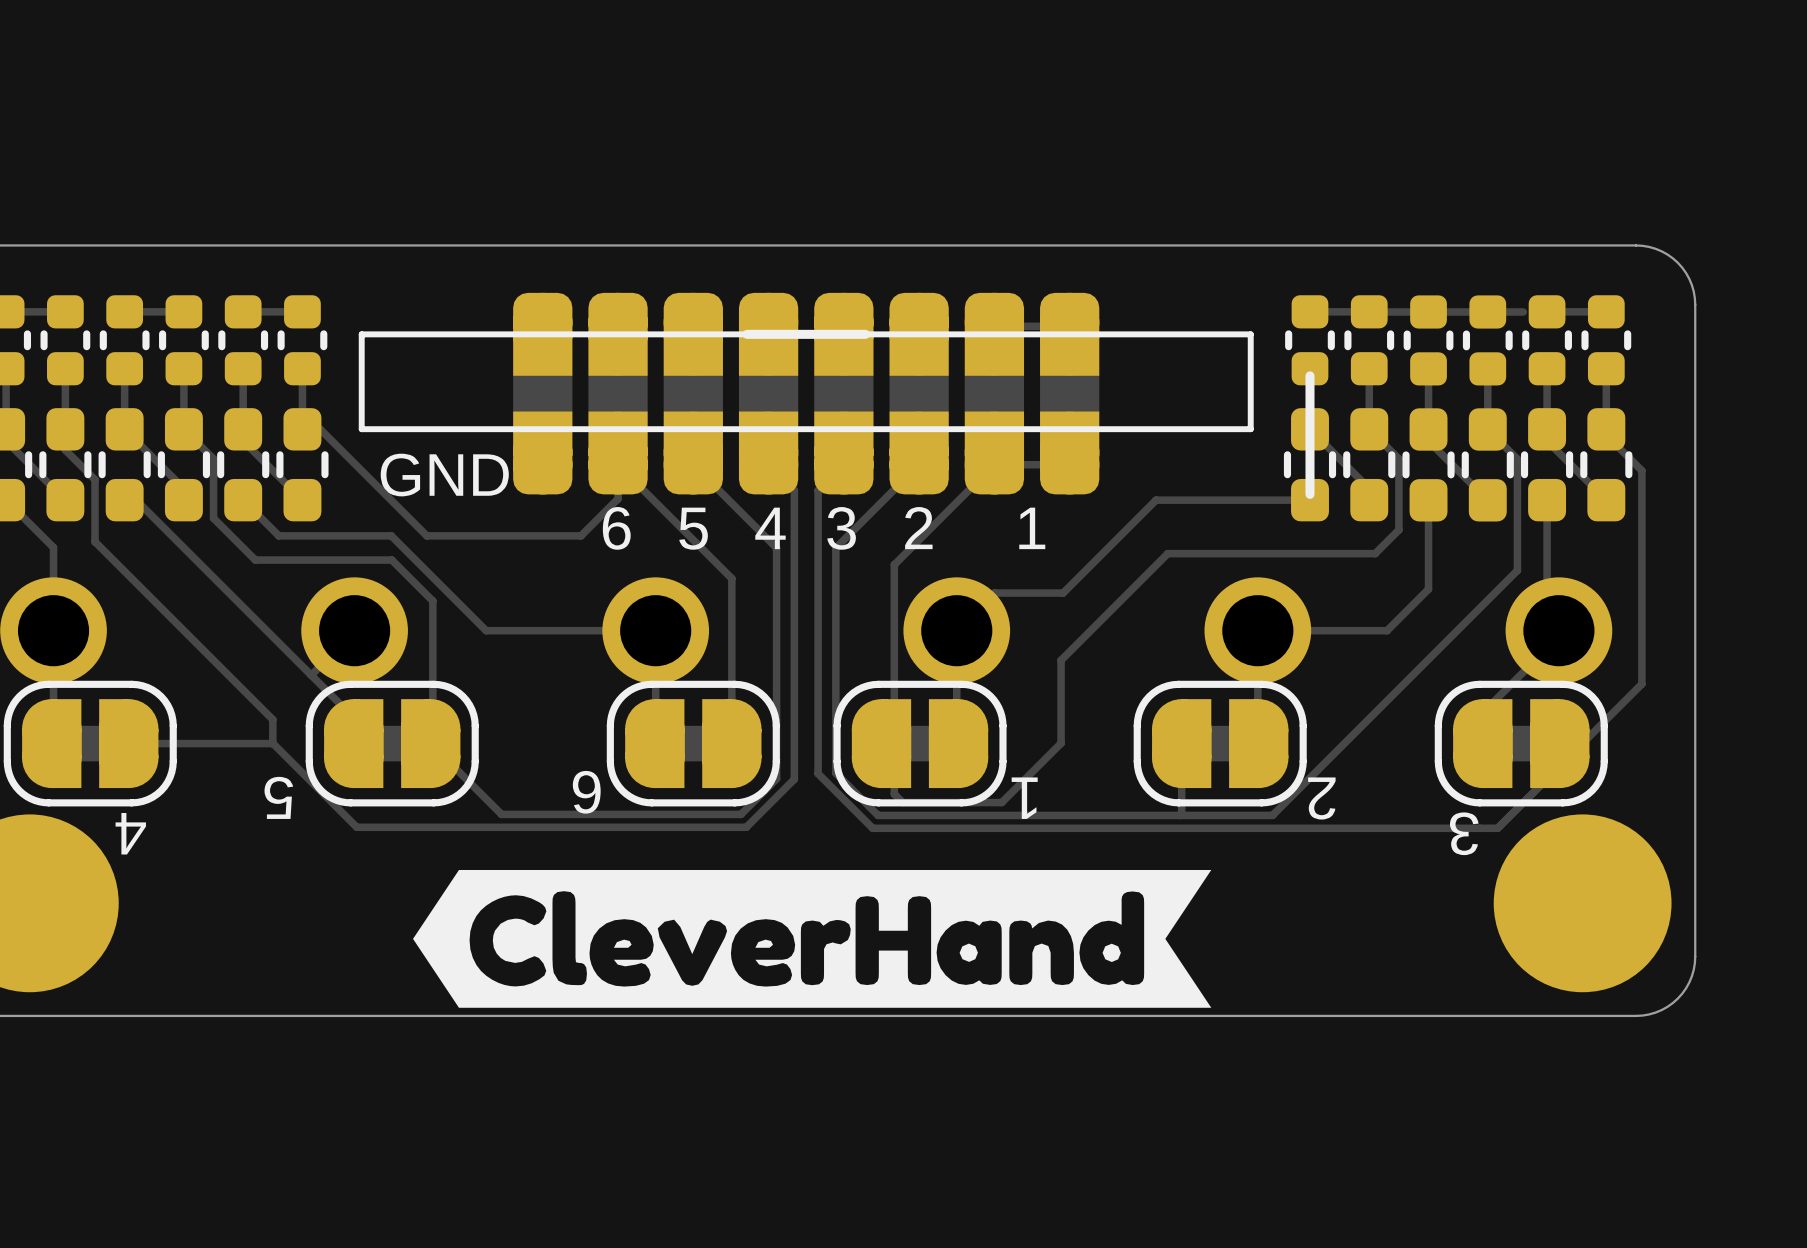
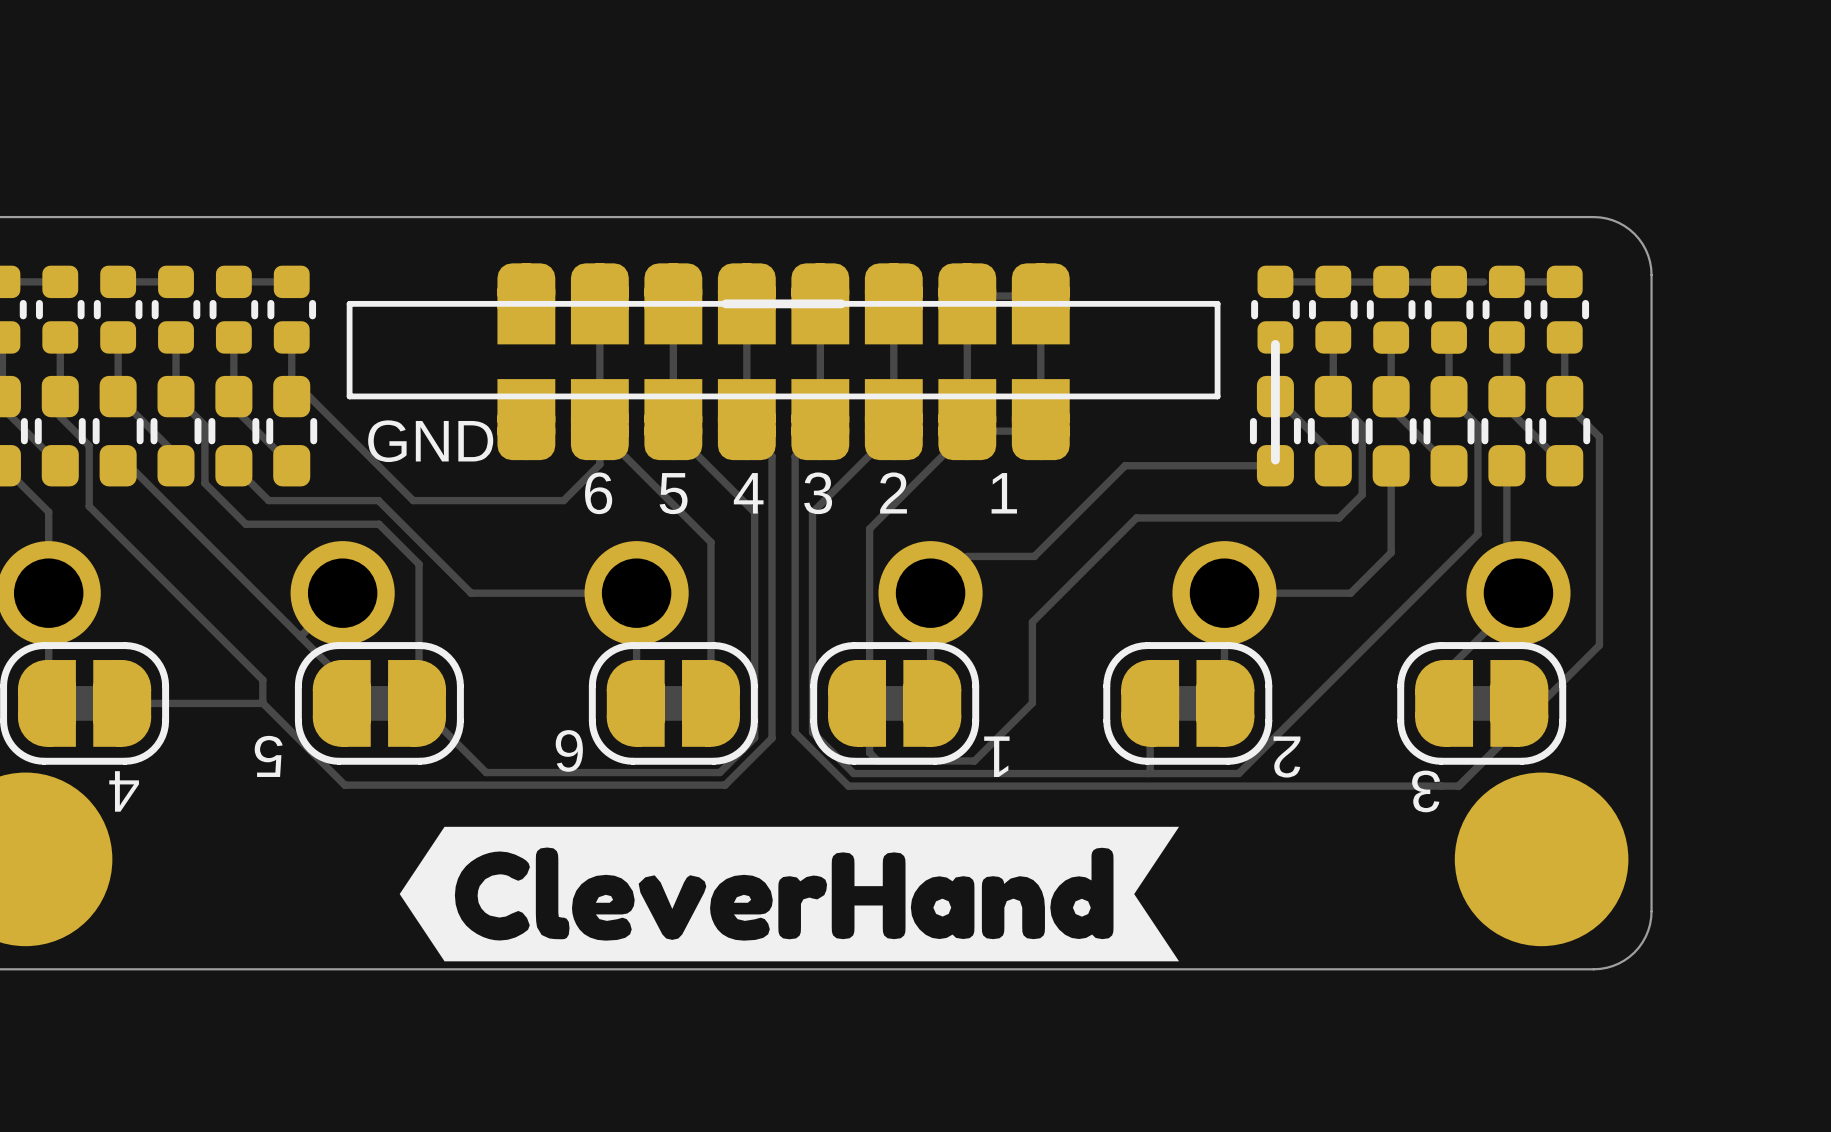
drawing: [513, 375, 1100, 412] -> none

